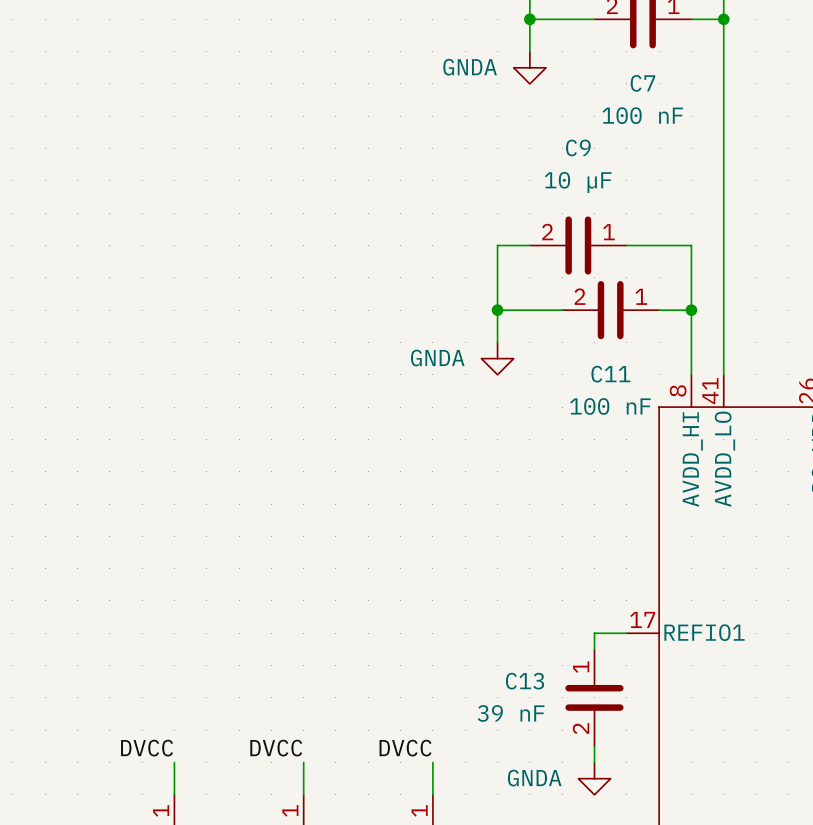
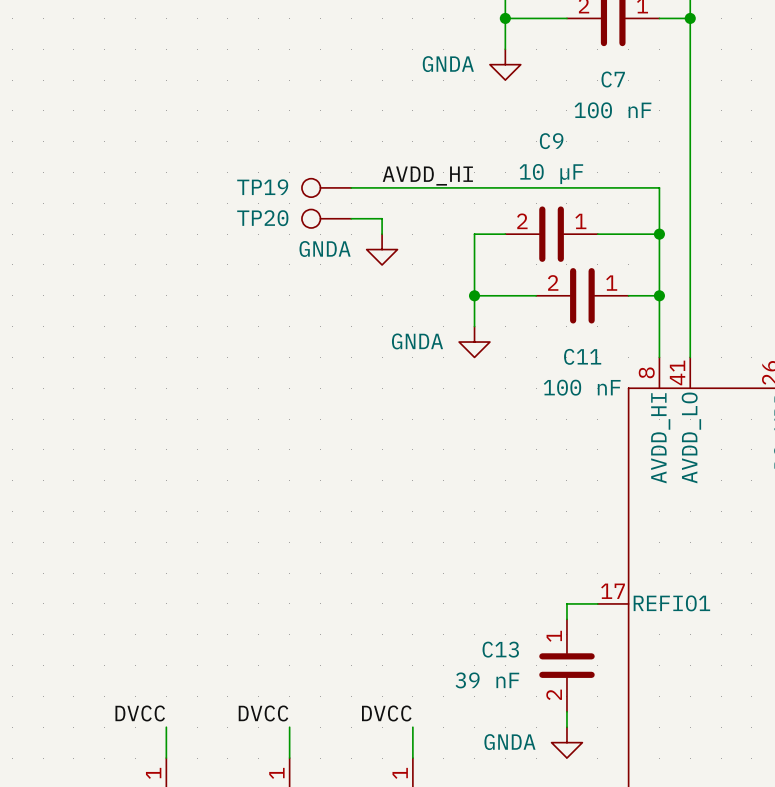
label: none -> AVDD_HI (427, 176)
TP19: none -> (326, 187)
wire: none -> (351, 187) (659, 187) (659, 234)
TP20: none -> (326, 218)
wire: none -> (351, 218) (382, 218) (382, 234)
junction: none -> (659, 234)
power symbol: none -> GNDA (382, 249)

